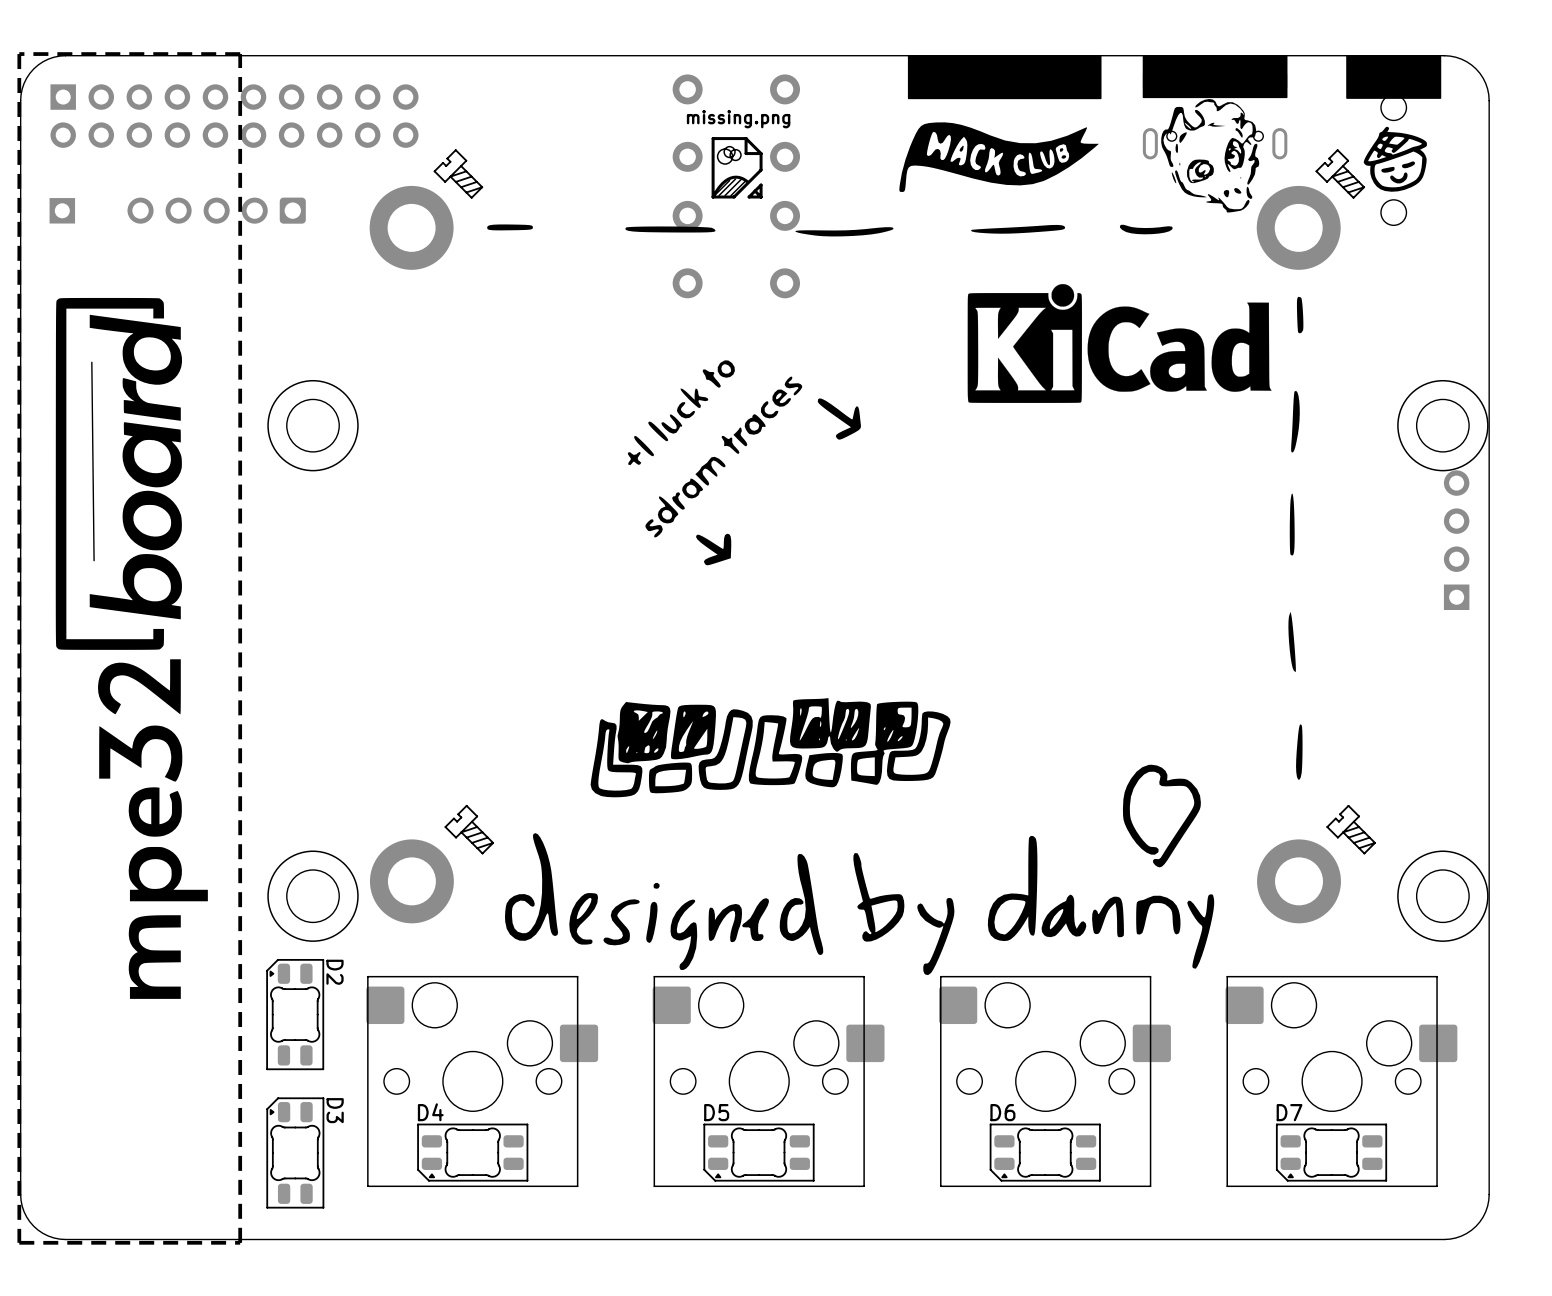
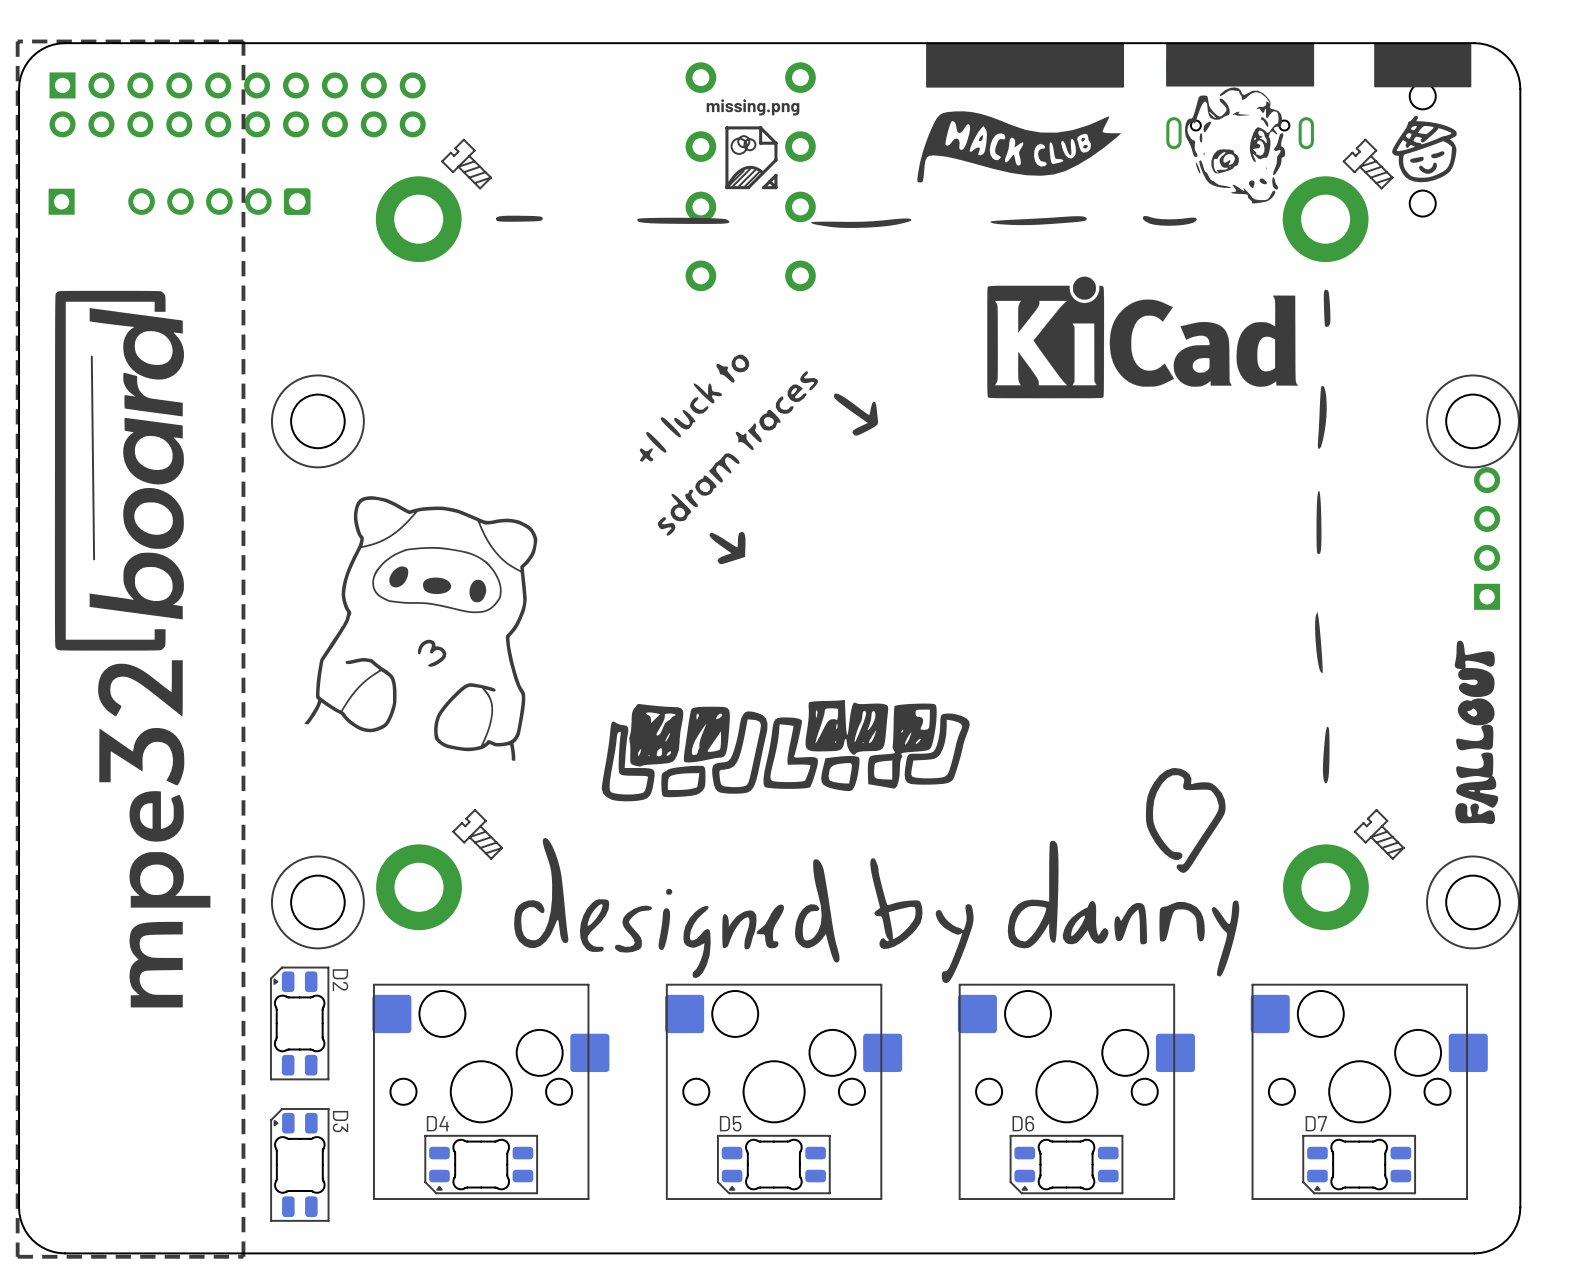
drawing: none -> [304, 496, 538, 761]
drawing: none -> [1454, 640, 1499, 825]

